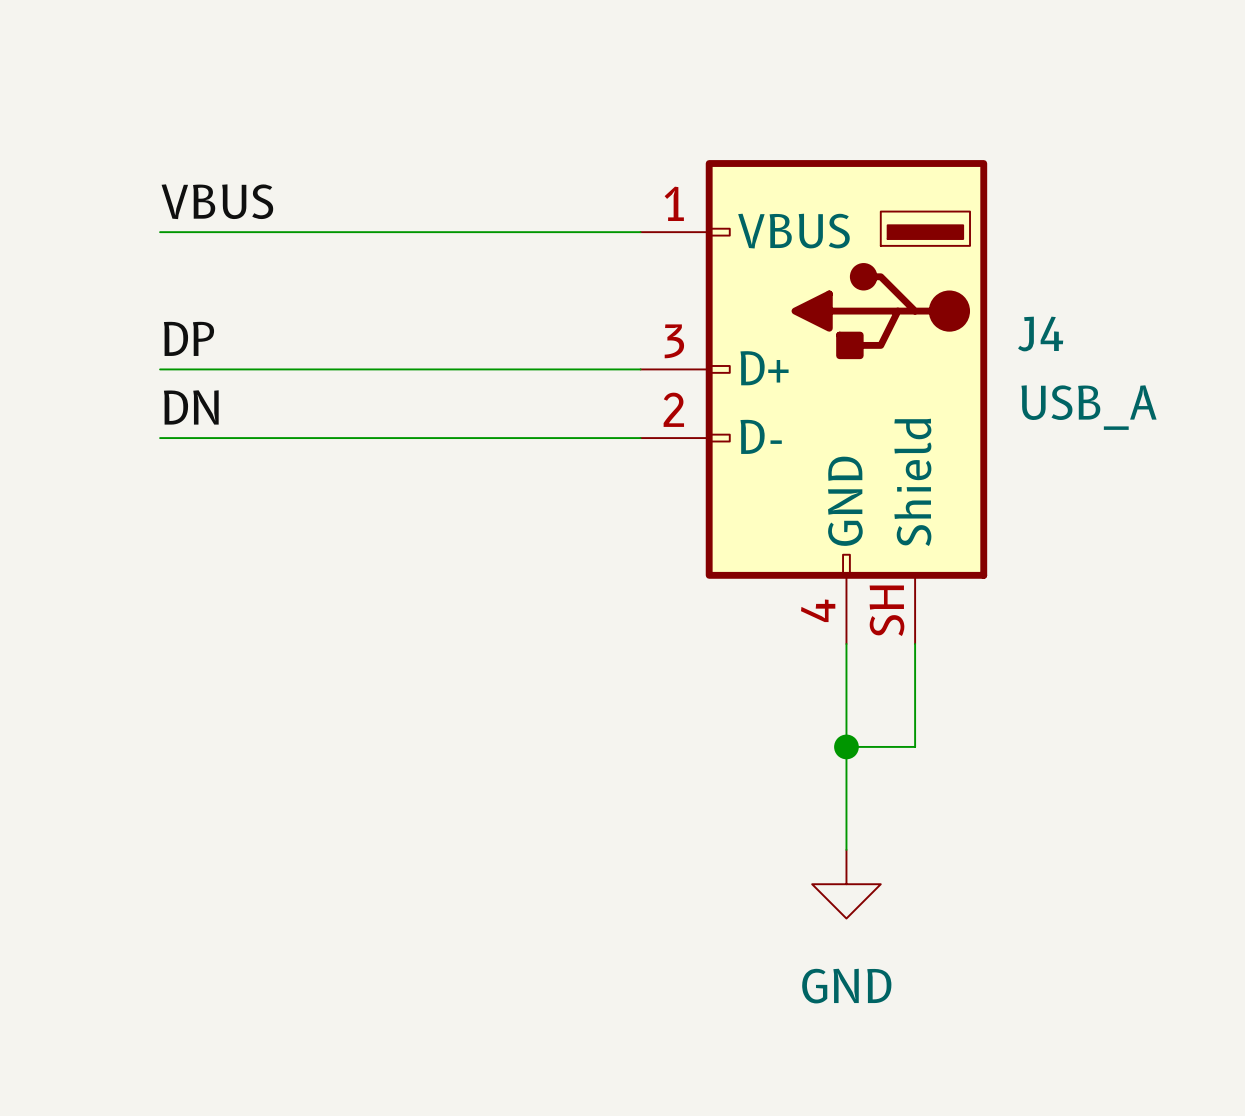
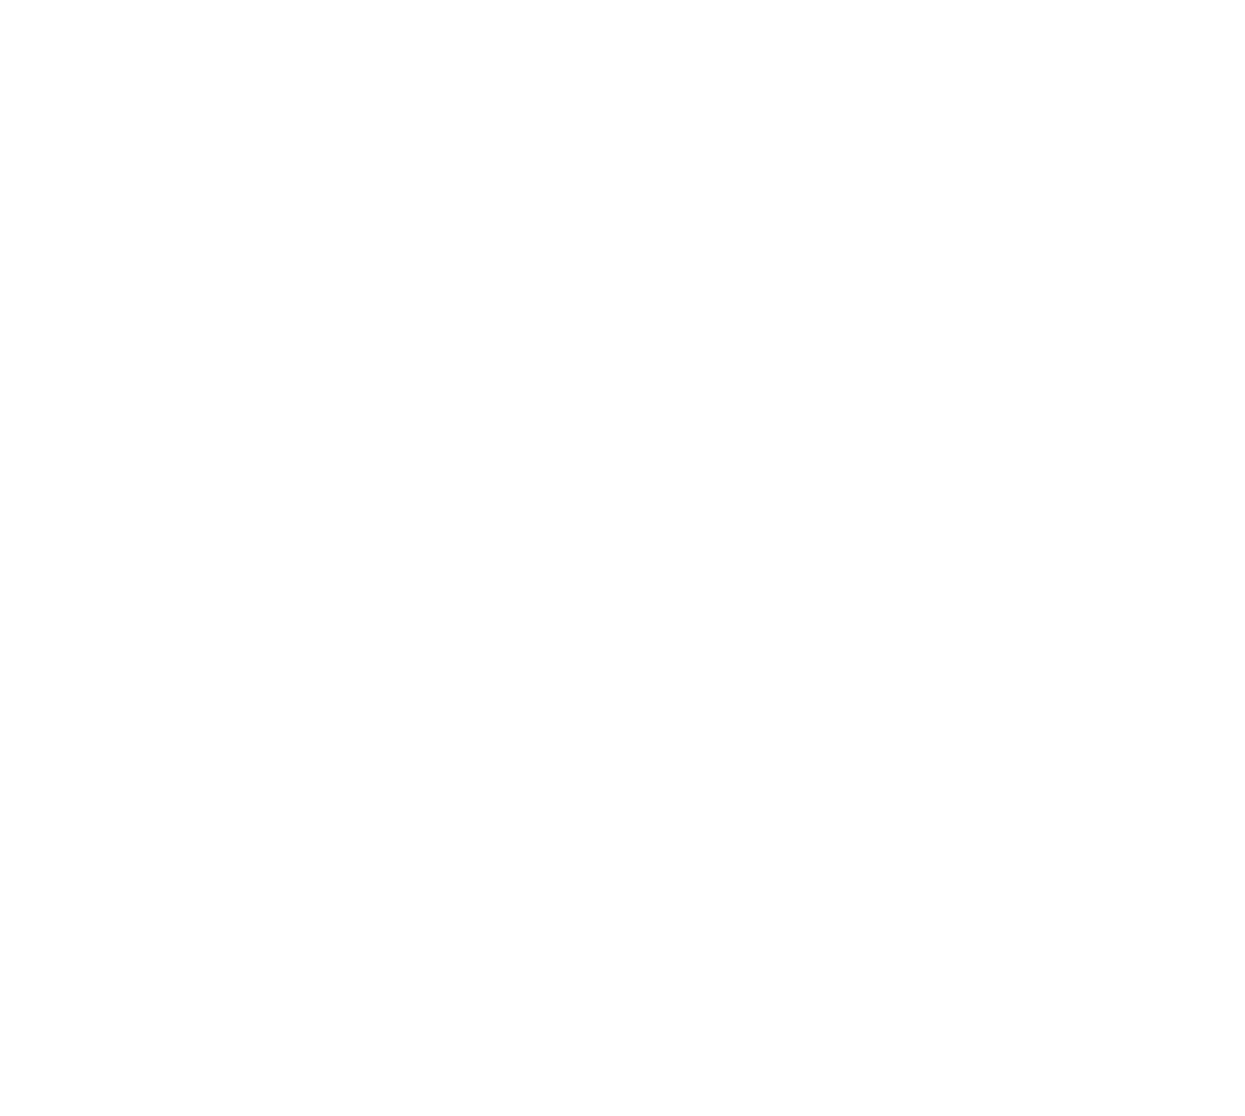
label: VBUS (217, 201) -> none
wire: (160, 232) (640, 232) -> none
label: DP (188, 338) -> none
wire: (160, 369) (640, 369) -> none
J4: USB_A (813, 402) -> none
label: DN (191, 407) -> none
wire: (160, 438) (640, 438) -> none
wire: (846, 643) (846, 849) -> none
wire: (915, 643) (915, 746) (846, 746) -> none
junction: (846, 746) -> none
power symbol: GND (846, 884) -> none

